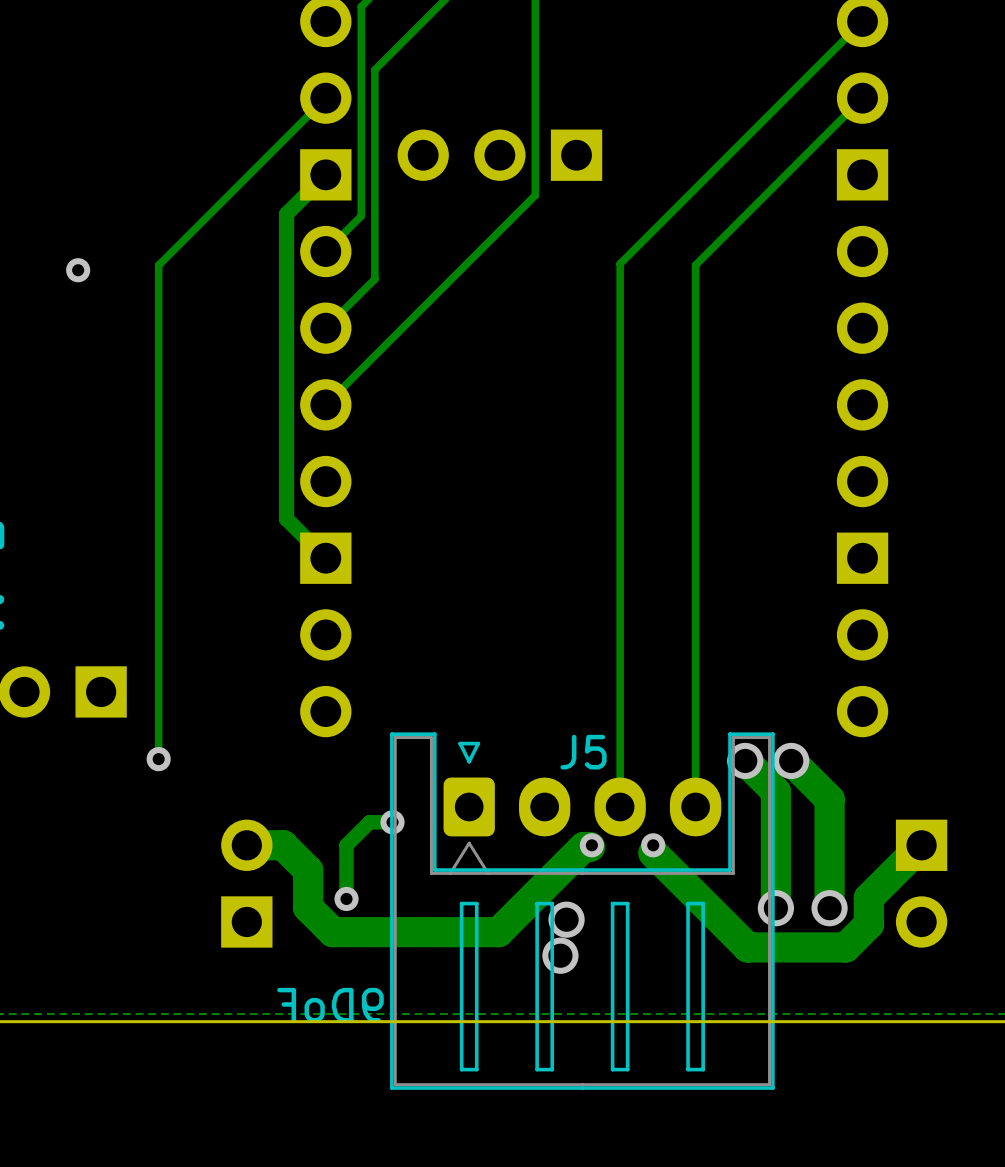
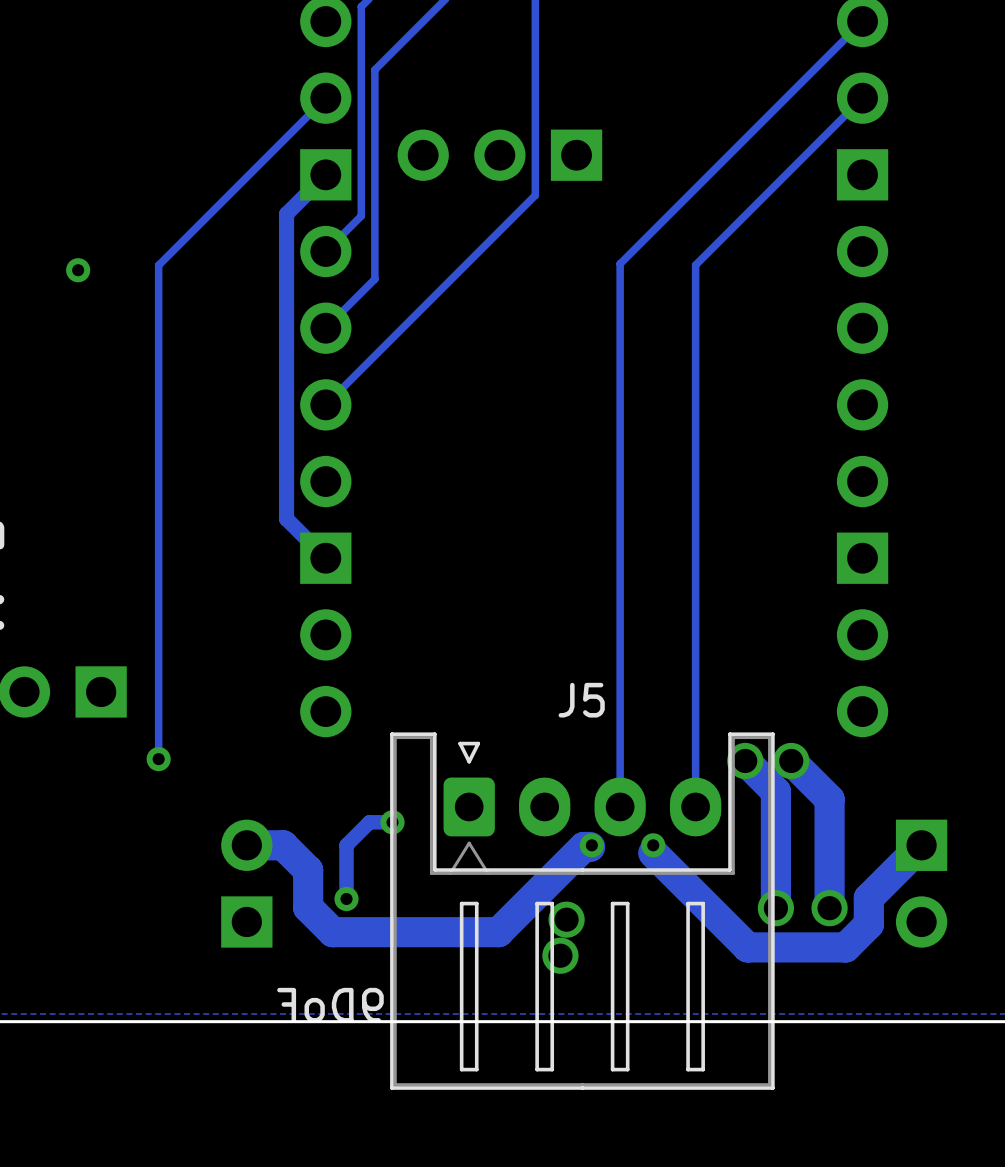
J5 name position: J5 (583, 752) -> J5 (581, 700)

